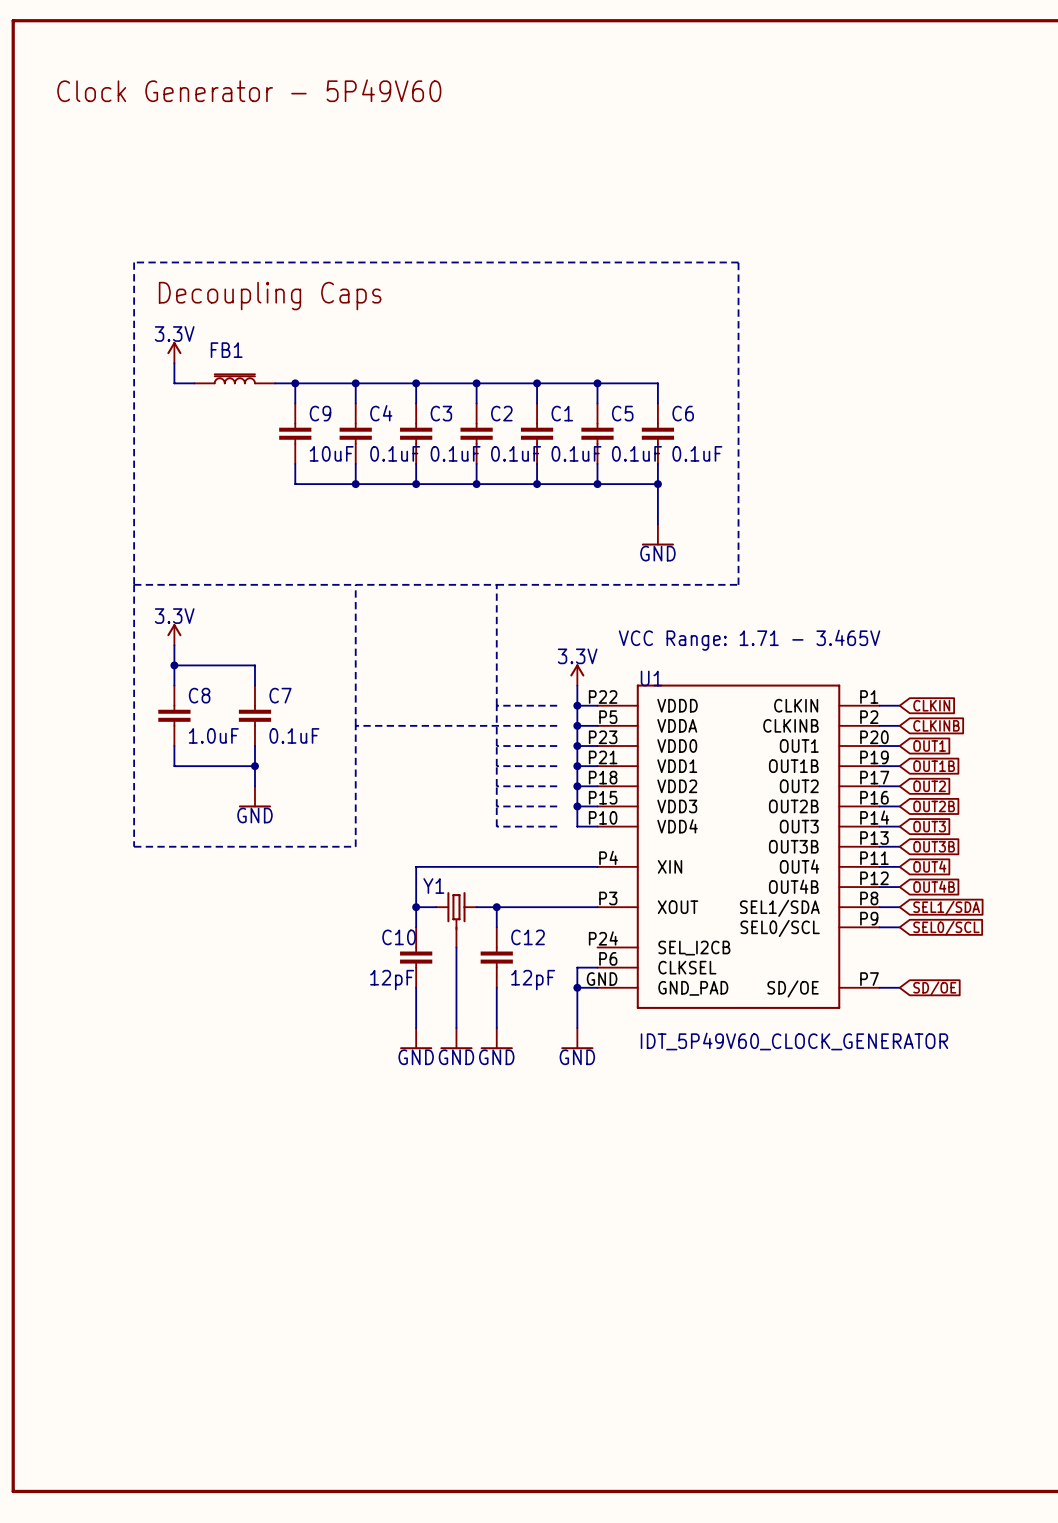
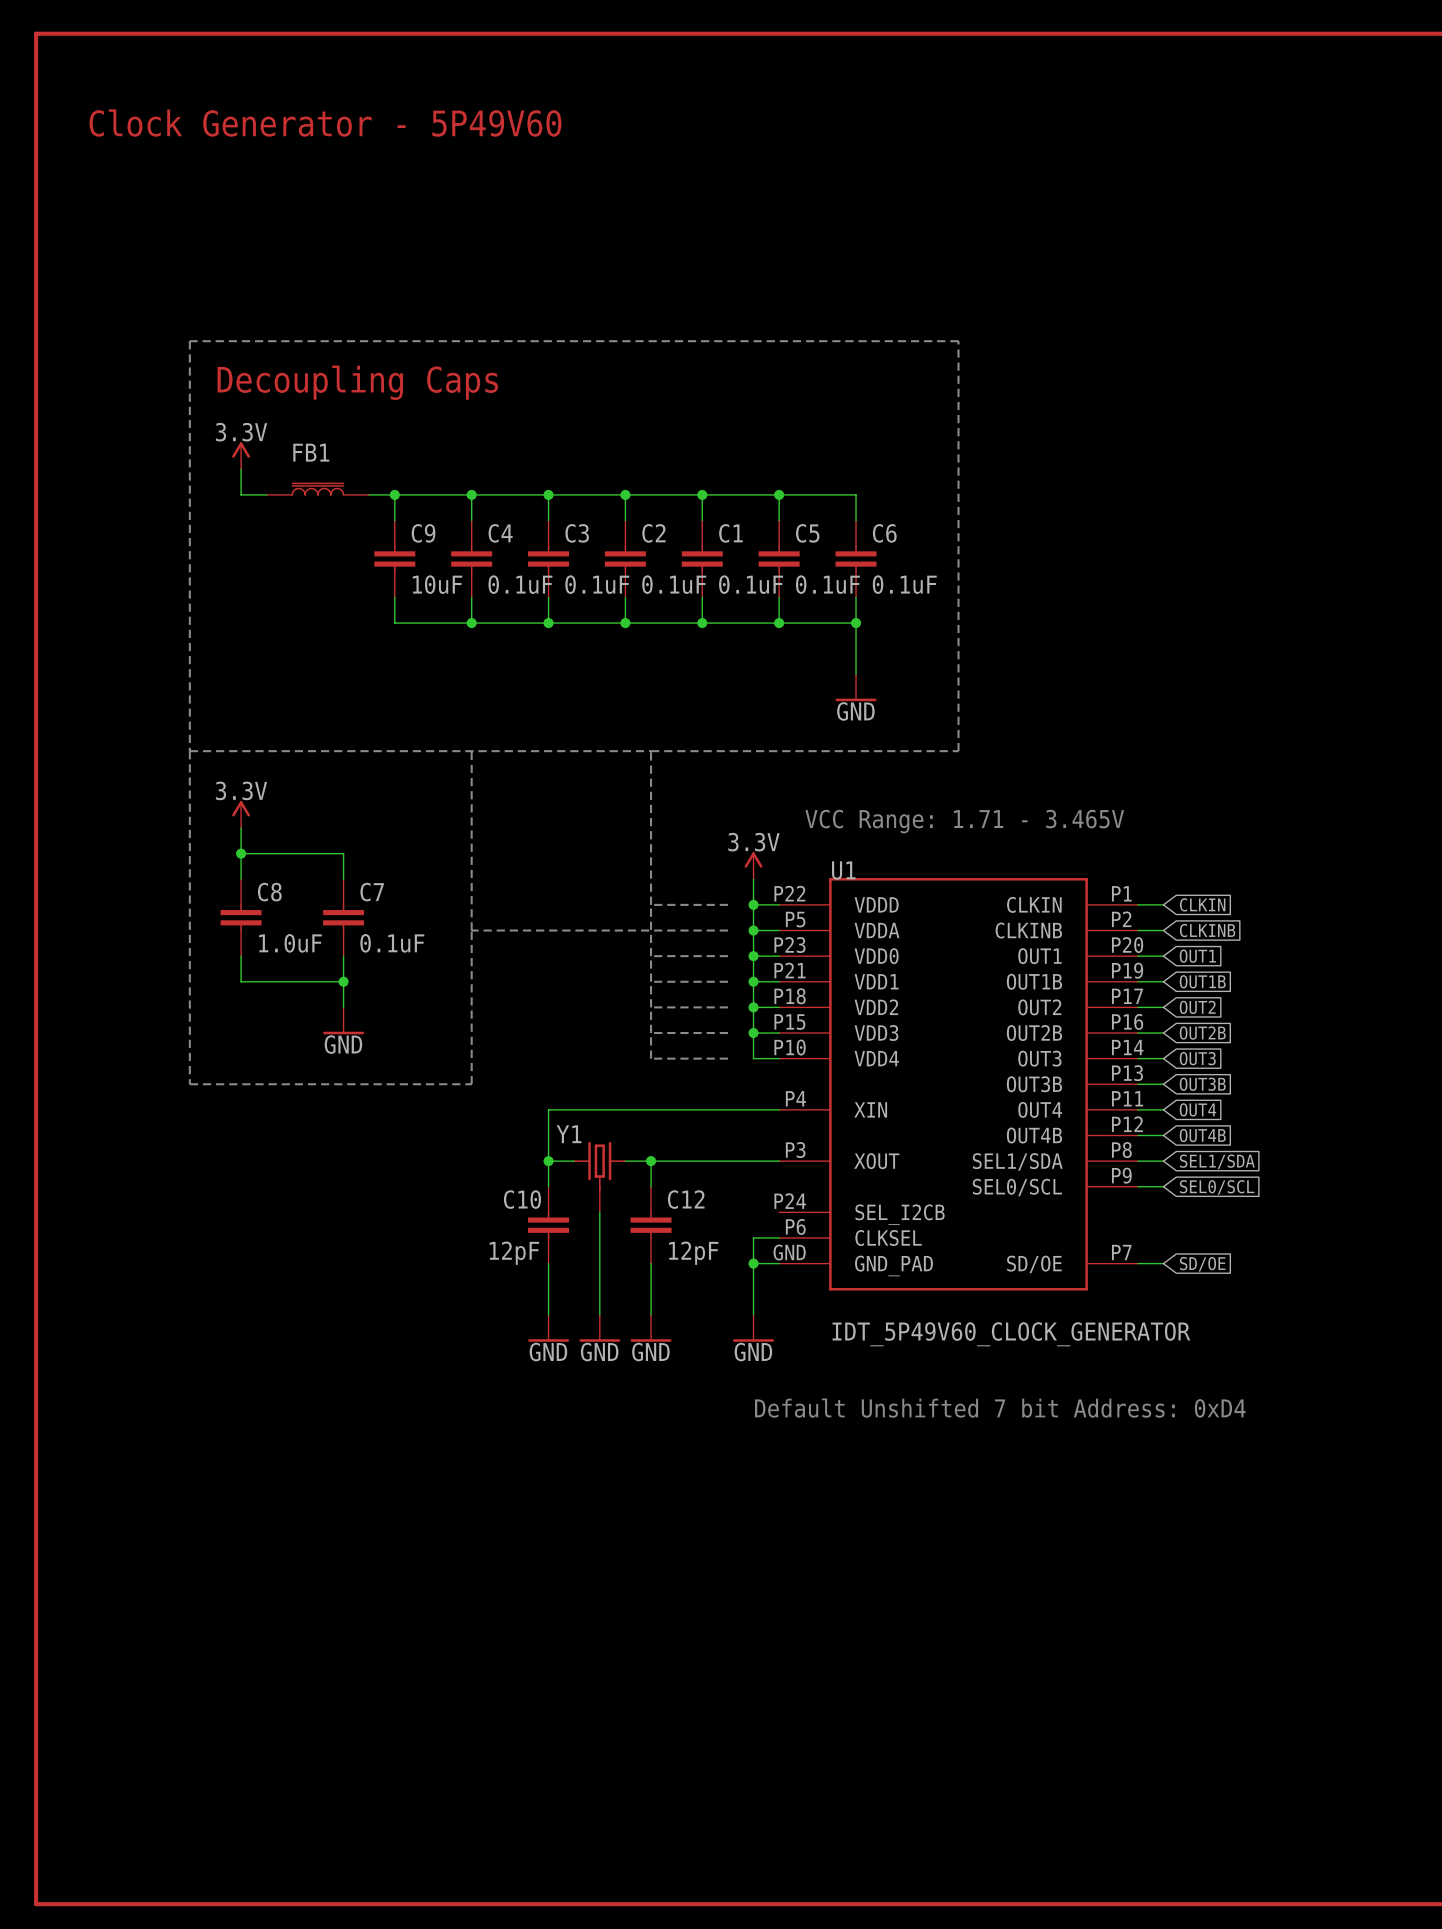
text: none -> Default Unshifted 7 bit Address: 0xD4 (1000, 1408)

